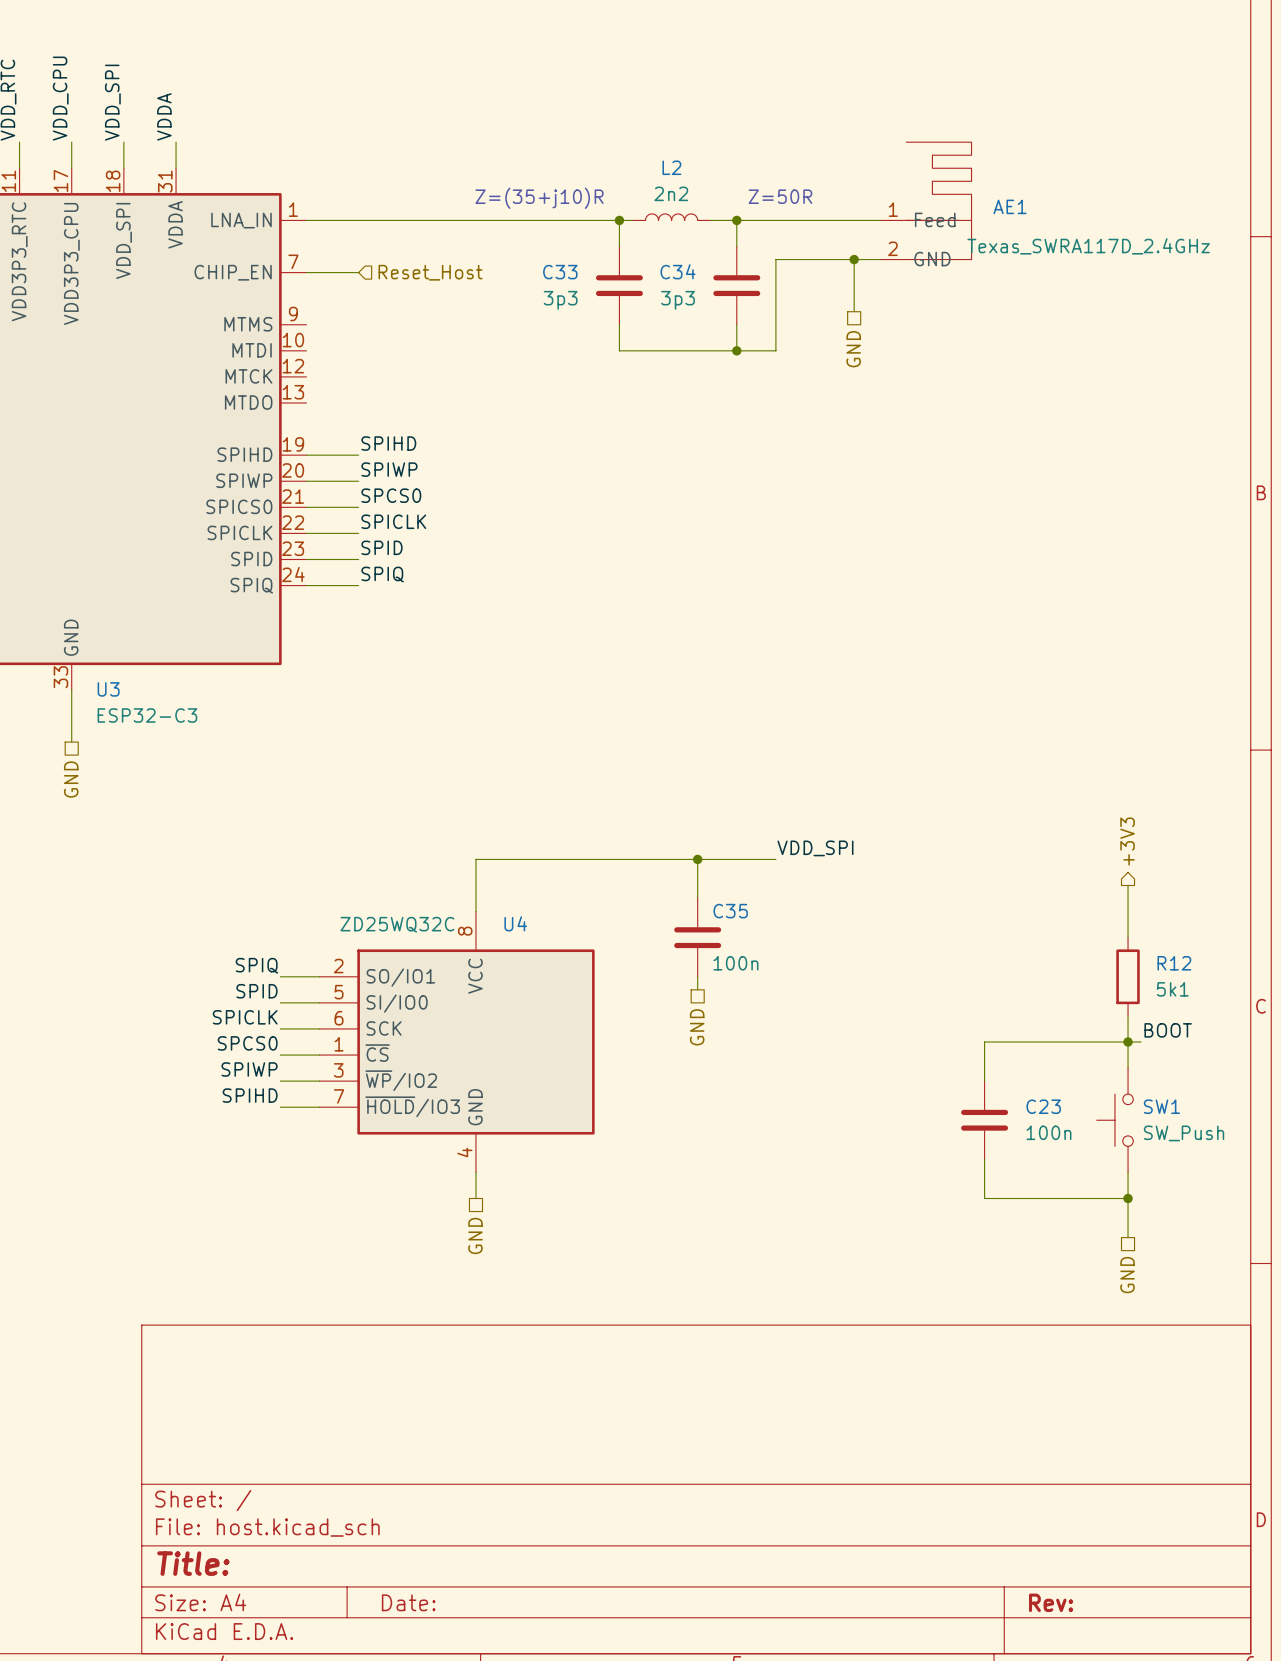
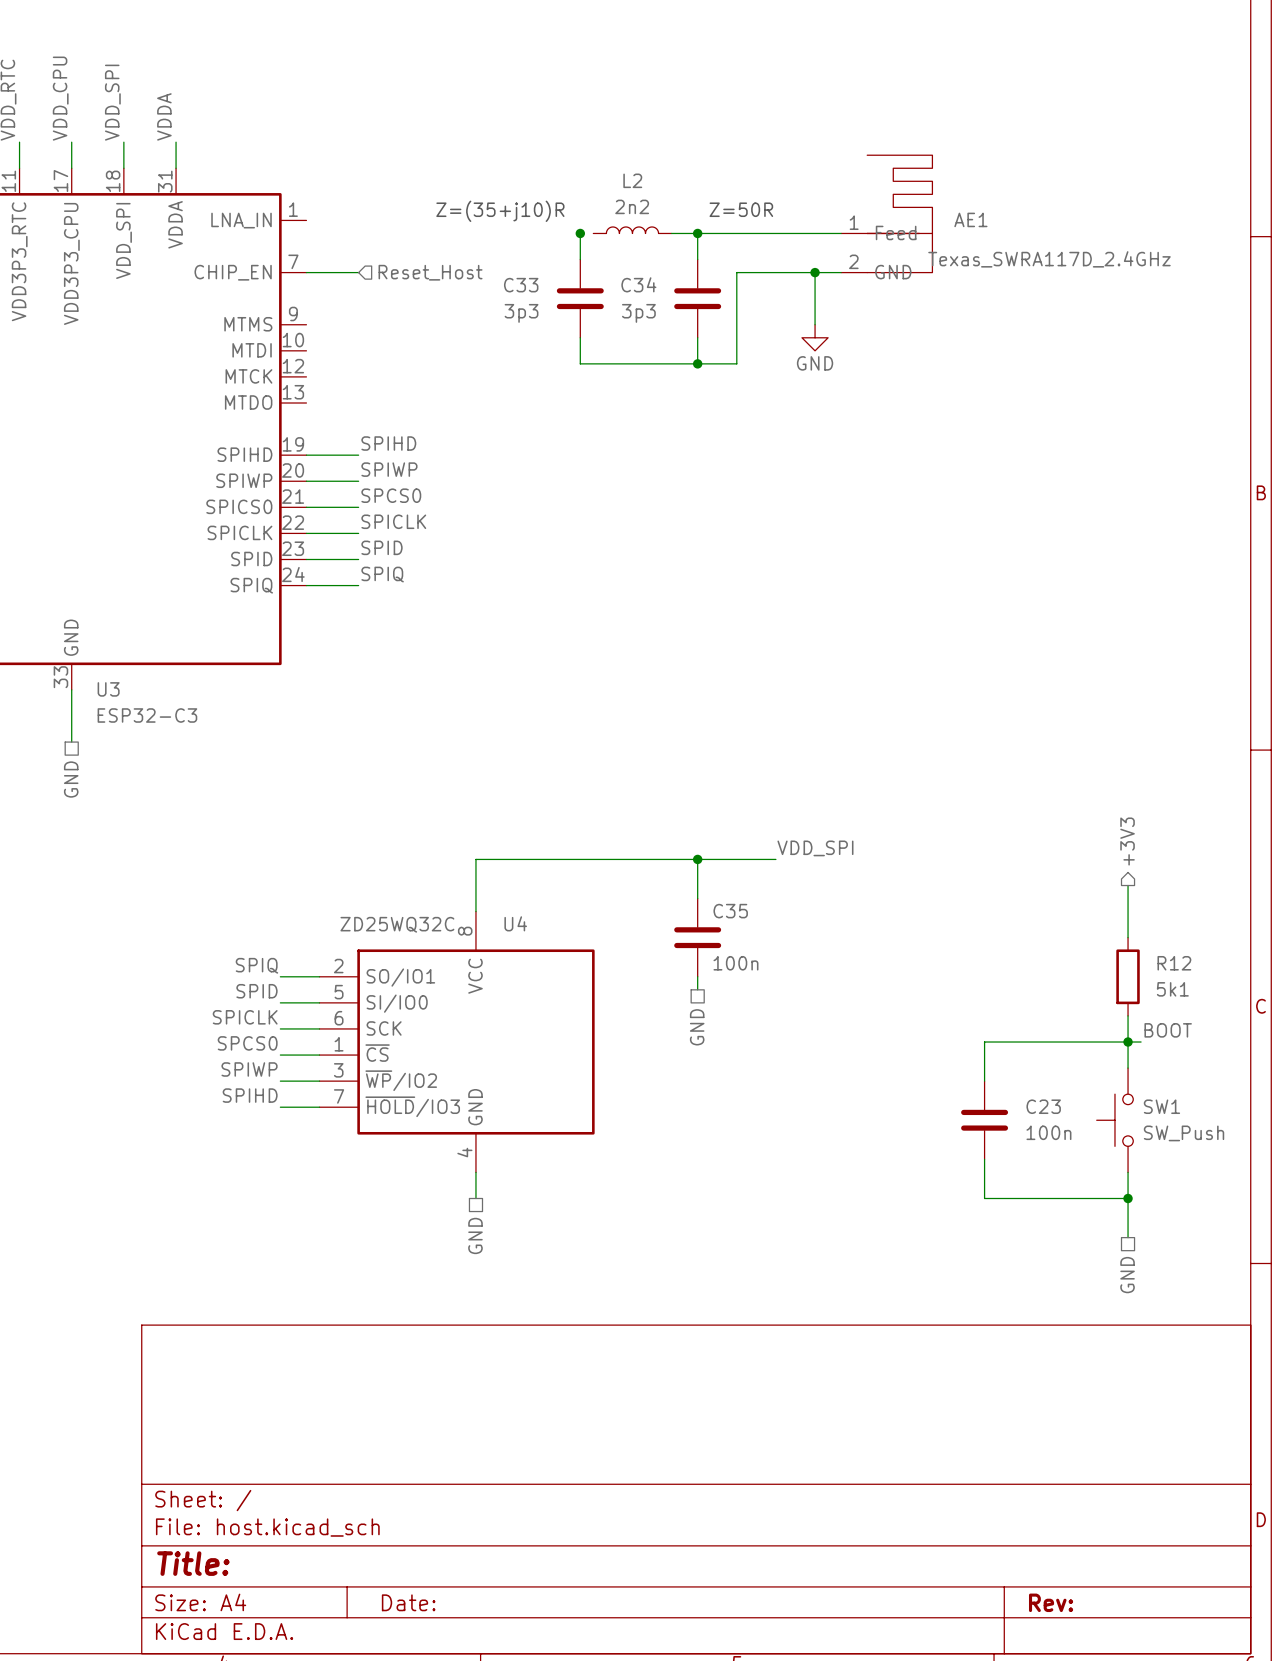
text position: Z=50R (780, 196) -> Z=50R (741, 209)
text position: Z=(35+j10)R (539, 198) -> Z=(35+j10)R (500, 211)
AE1 position: (925, 200) -> (886, 213)
L2 position: (671, 217) -> (632, 230)
wire: (306, 220) (632, 220) -> none
wire: (619, 220) (619, 246) -> (580, 233) (580, 259)
junction: (619, 220) -> none
wire: (710, 220) (880, 220) -> (671, 233) (841, 233)
wire: (736, 220) (736, 246) -> (697, 233) (697, 259)
junction: (736, 220) -> none
junction: none -> (580, 233)
junction: none -> (697, 233)
wire: (854, 259) (854, 311) -> (815, 272) (815, 324)
junction position: (854, 259) -> (815, 272)
wire: (880, 259) (775, 259) (775, 350) (619, 350) (619, 324) -> none
wire: none -> (841, 272) (736, 272) (736, 324)
C33 position: (619, 285) -> (580, 298)
C34 position: (736, 285) -> (697, 298)
wire: none -> (580, 337) (580, 363) (736, 363) (736, 350)
wire: none -> (697, 337) (697, 363)
power symbol: none -> GND (815, 337)
hierarchical label: GND (853, 349) -> none
junction position: (736, 350) -> (697, 363)

